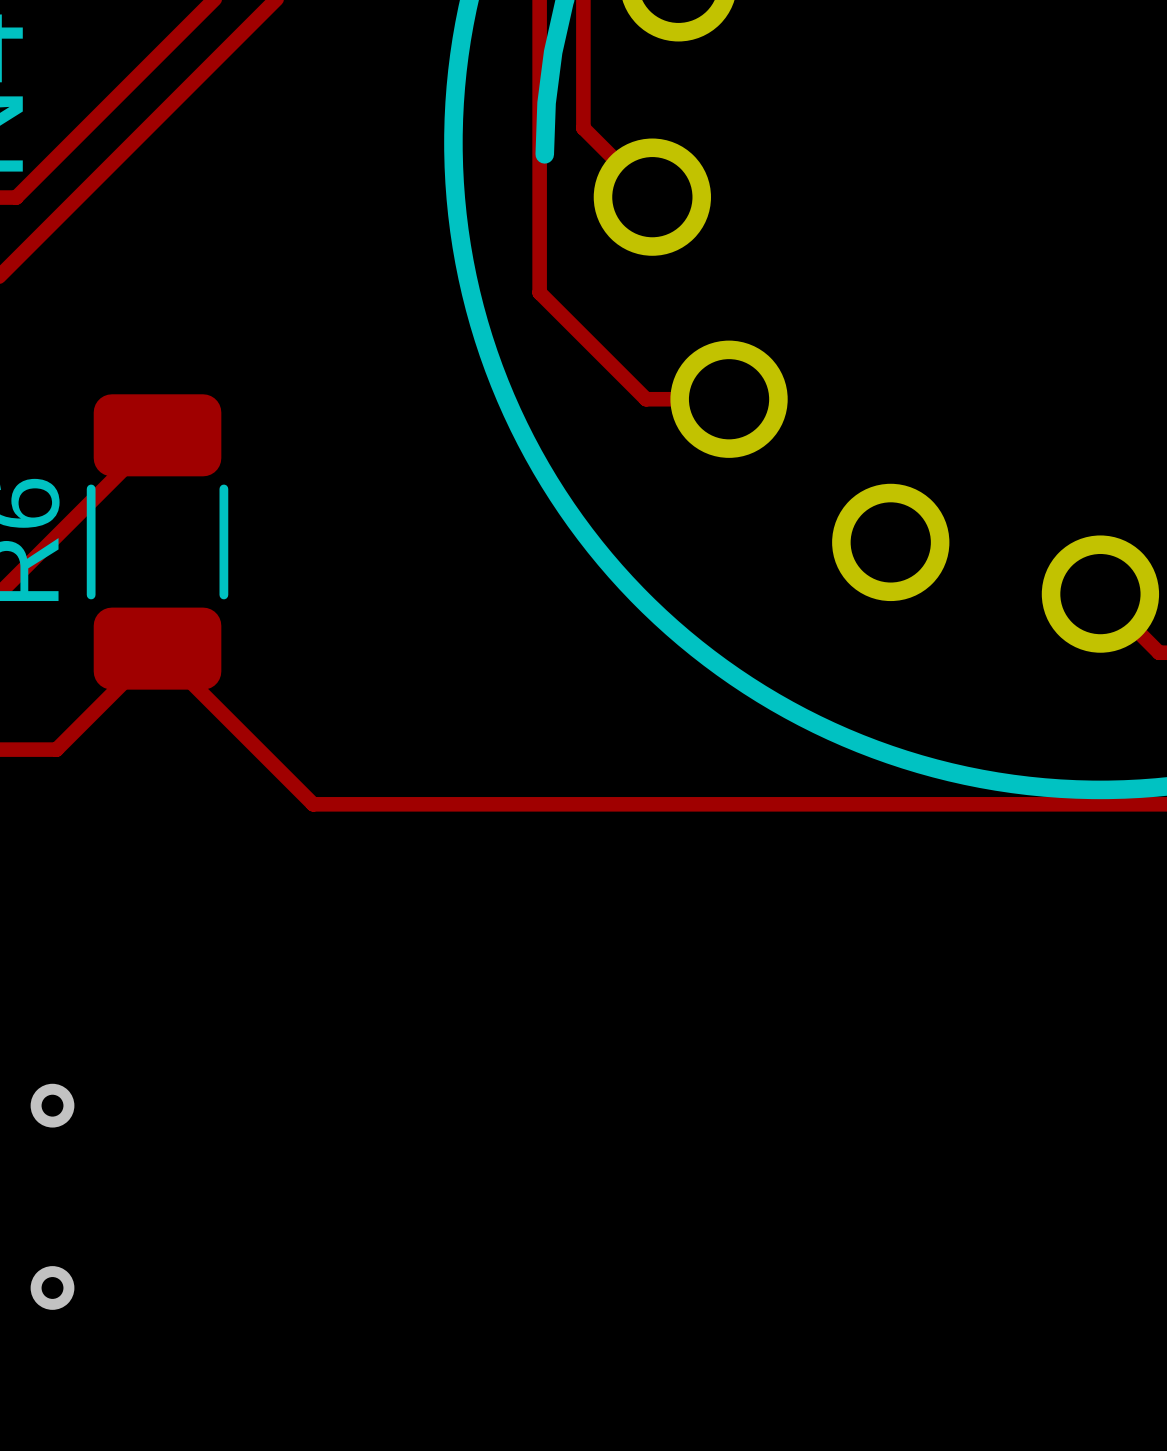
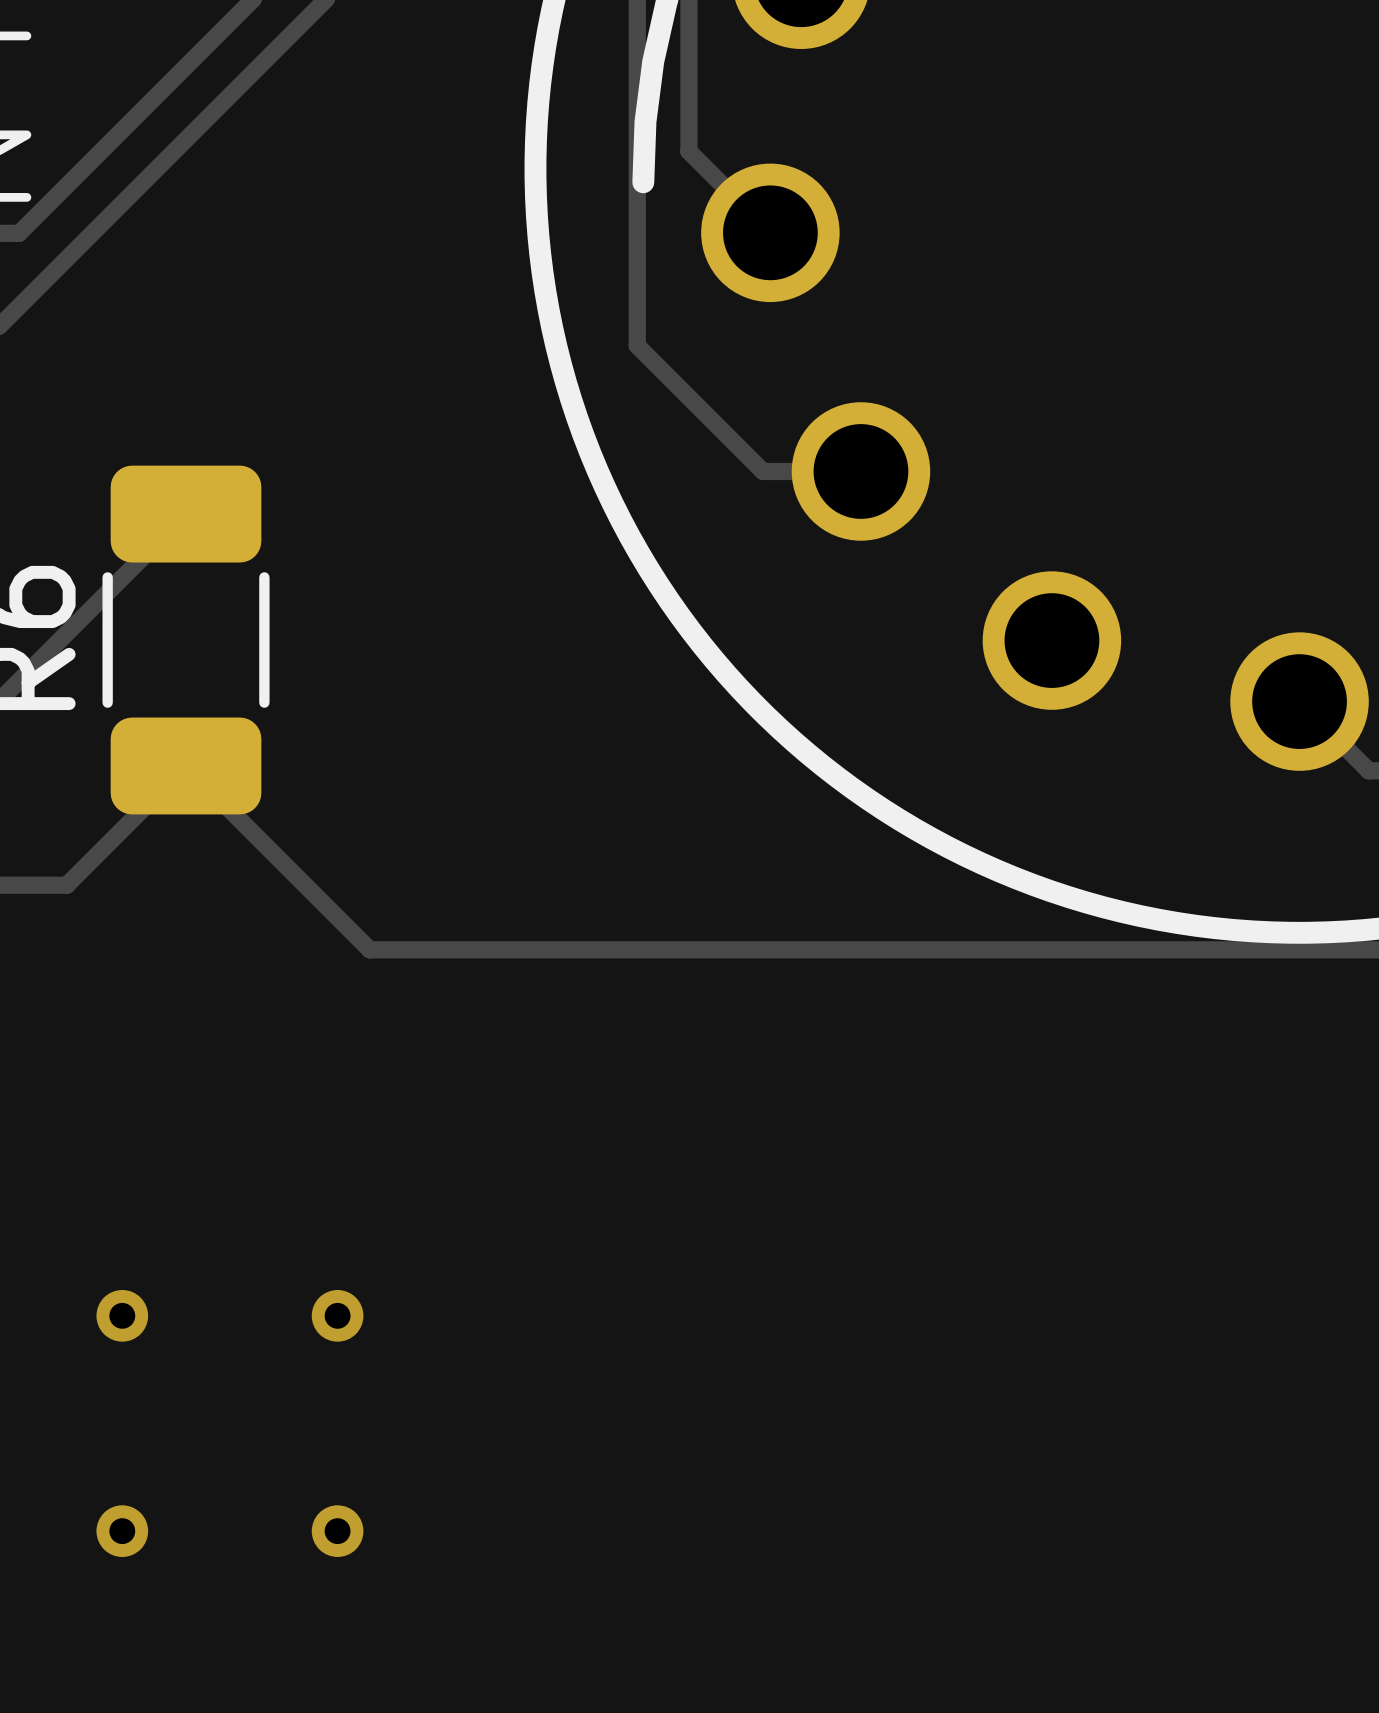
via position: (52, 1105) -> (122, 1315)
via: none -> (337, 1315)
via position: (52, 1287) -> (122, 1531)
via: none -> (337, 1531)

